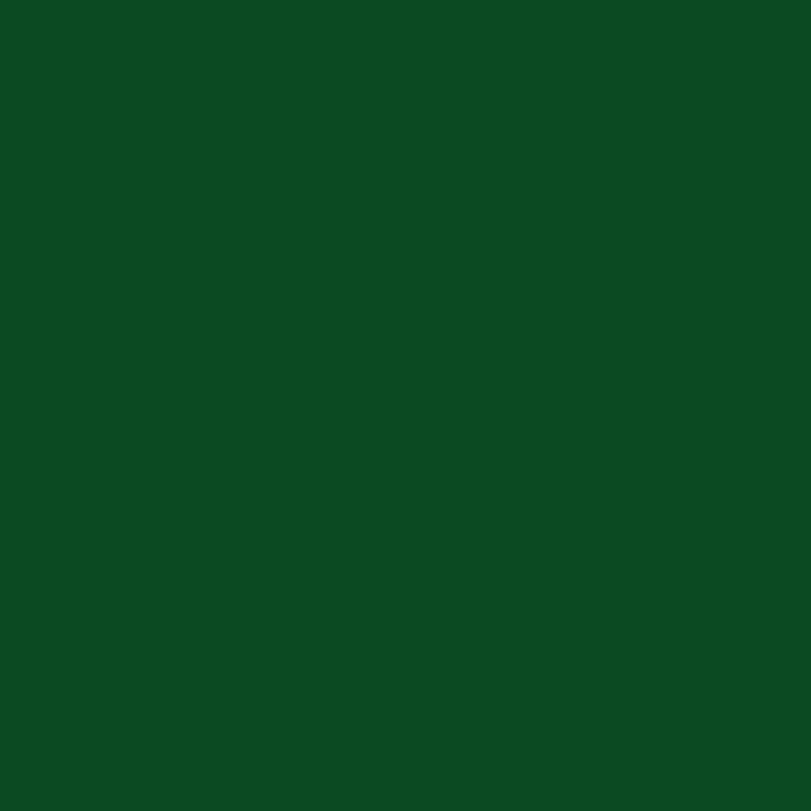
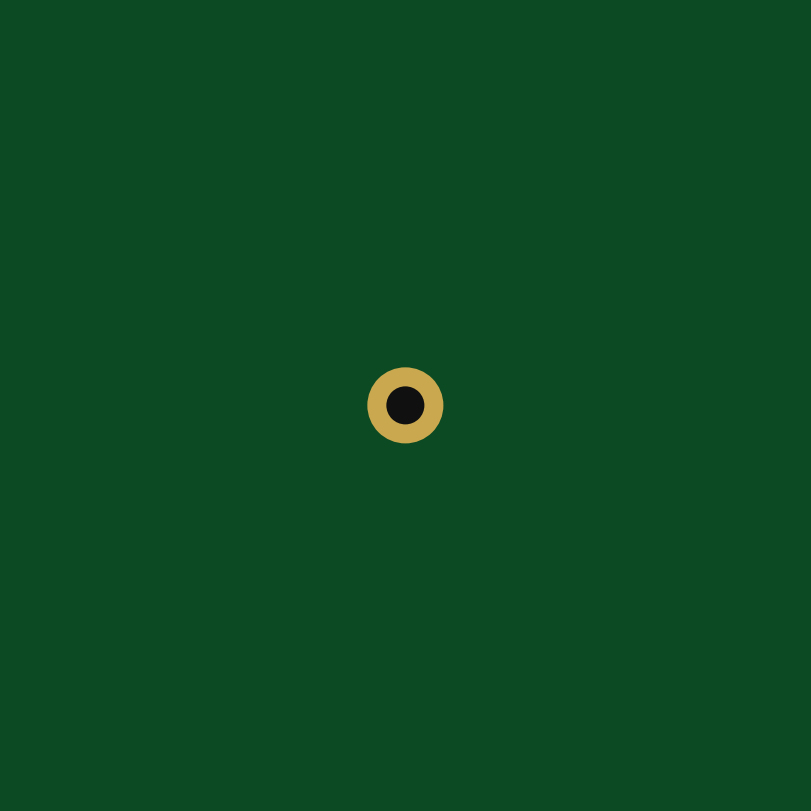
via: none -> (405, 405)

